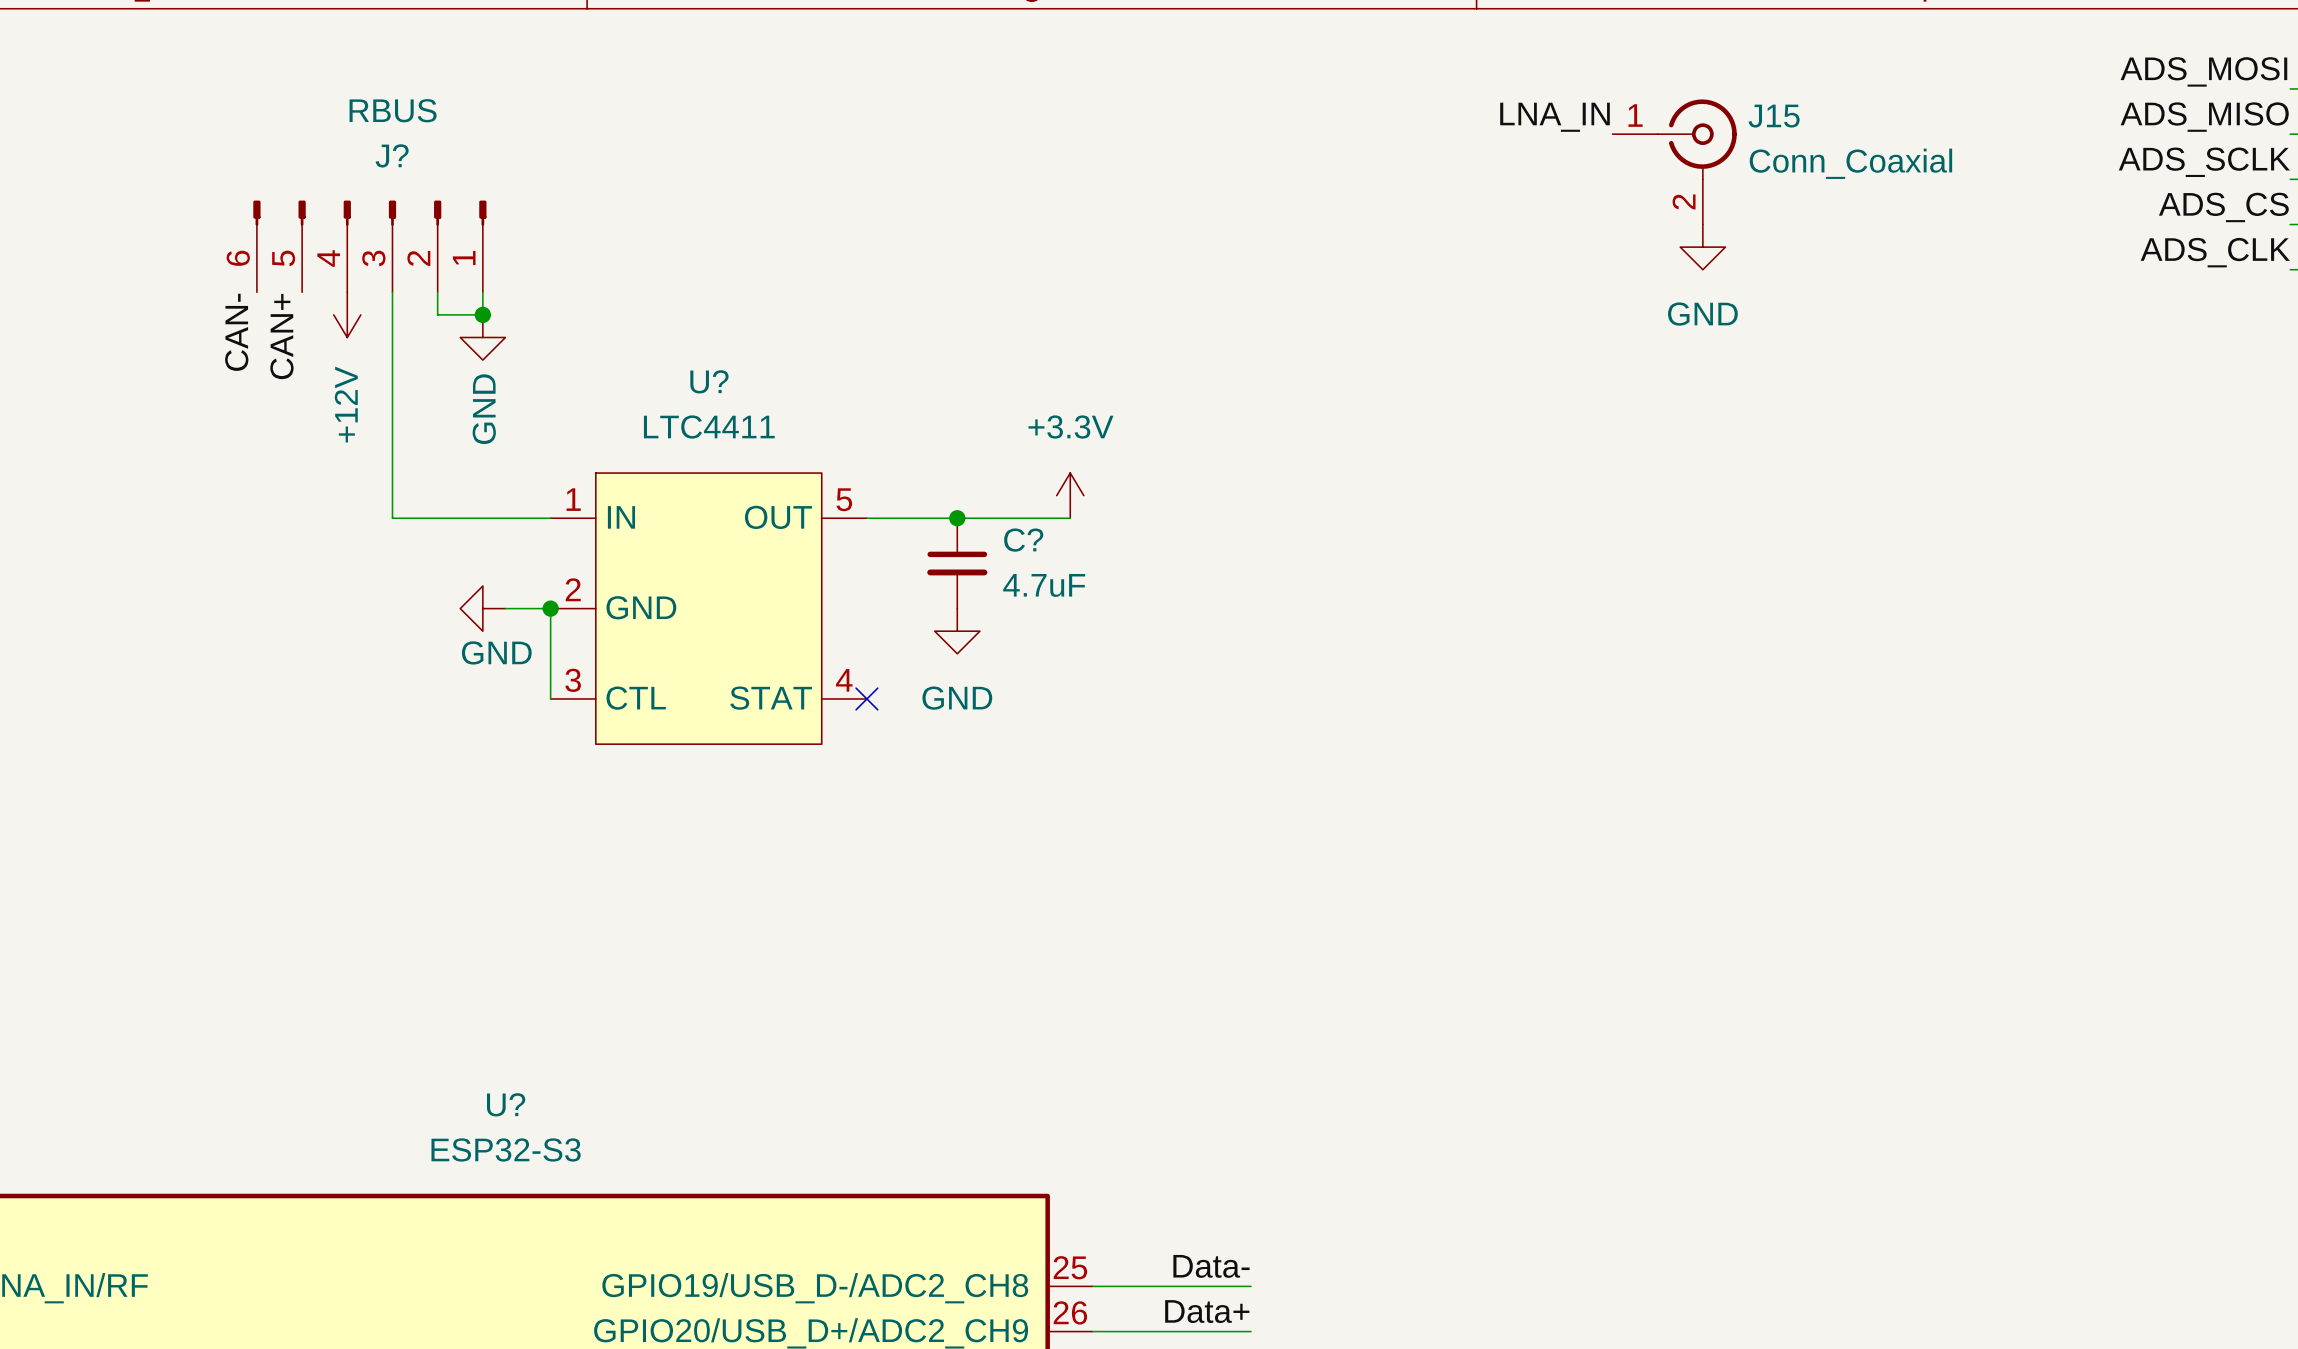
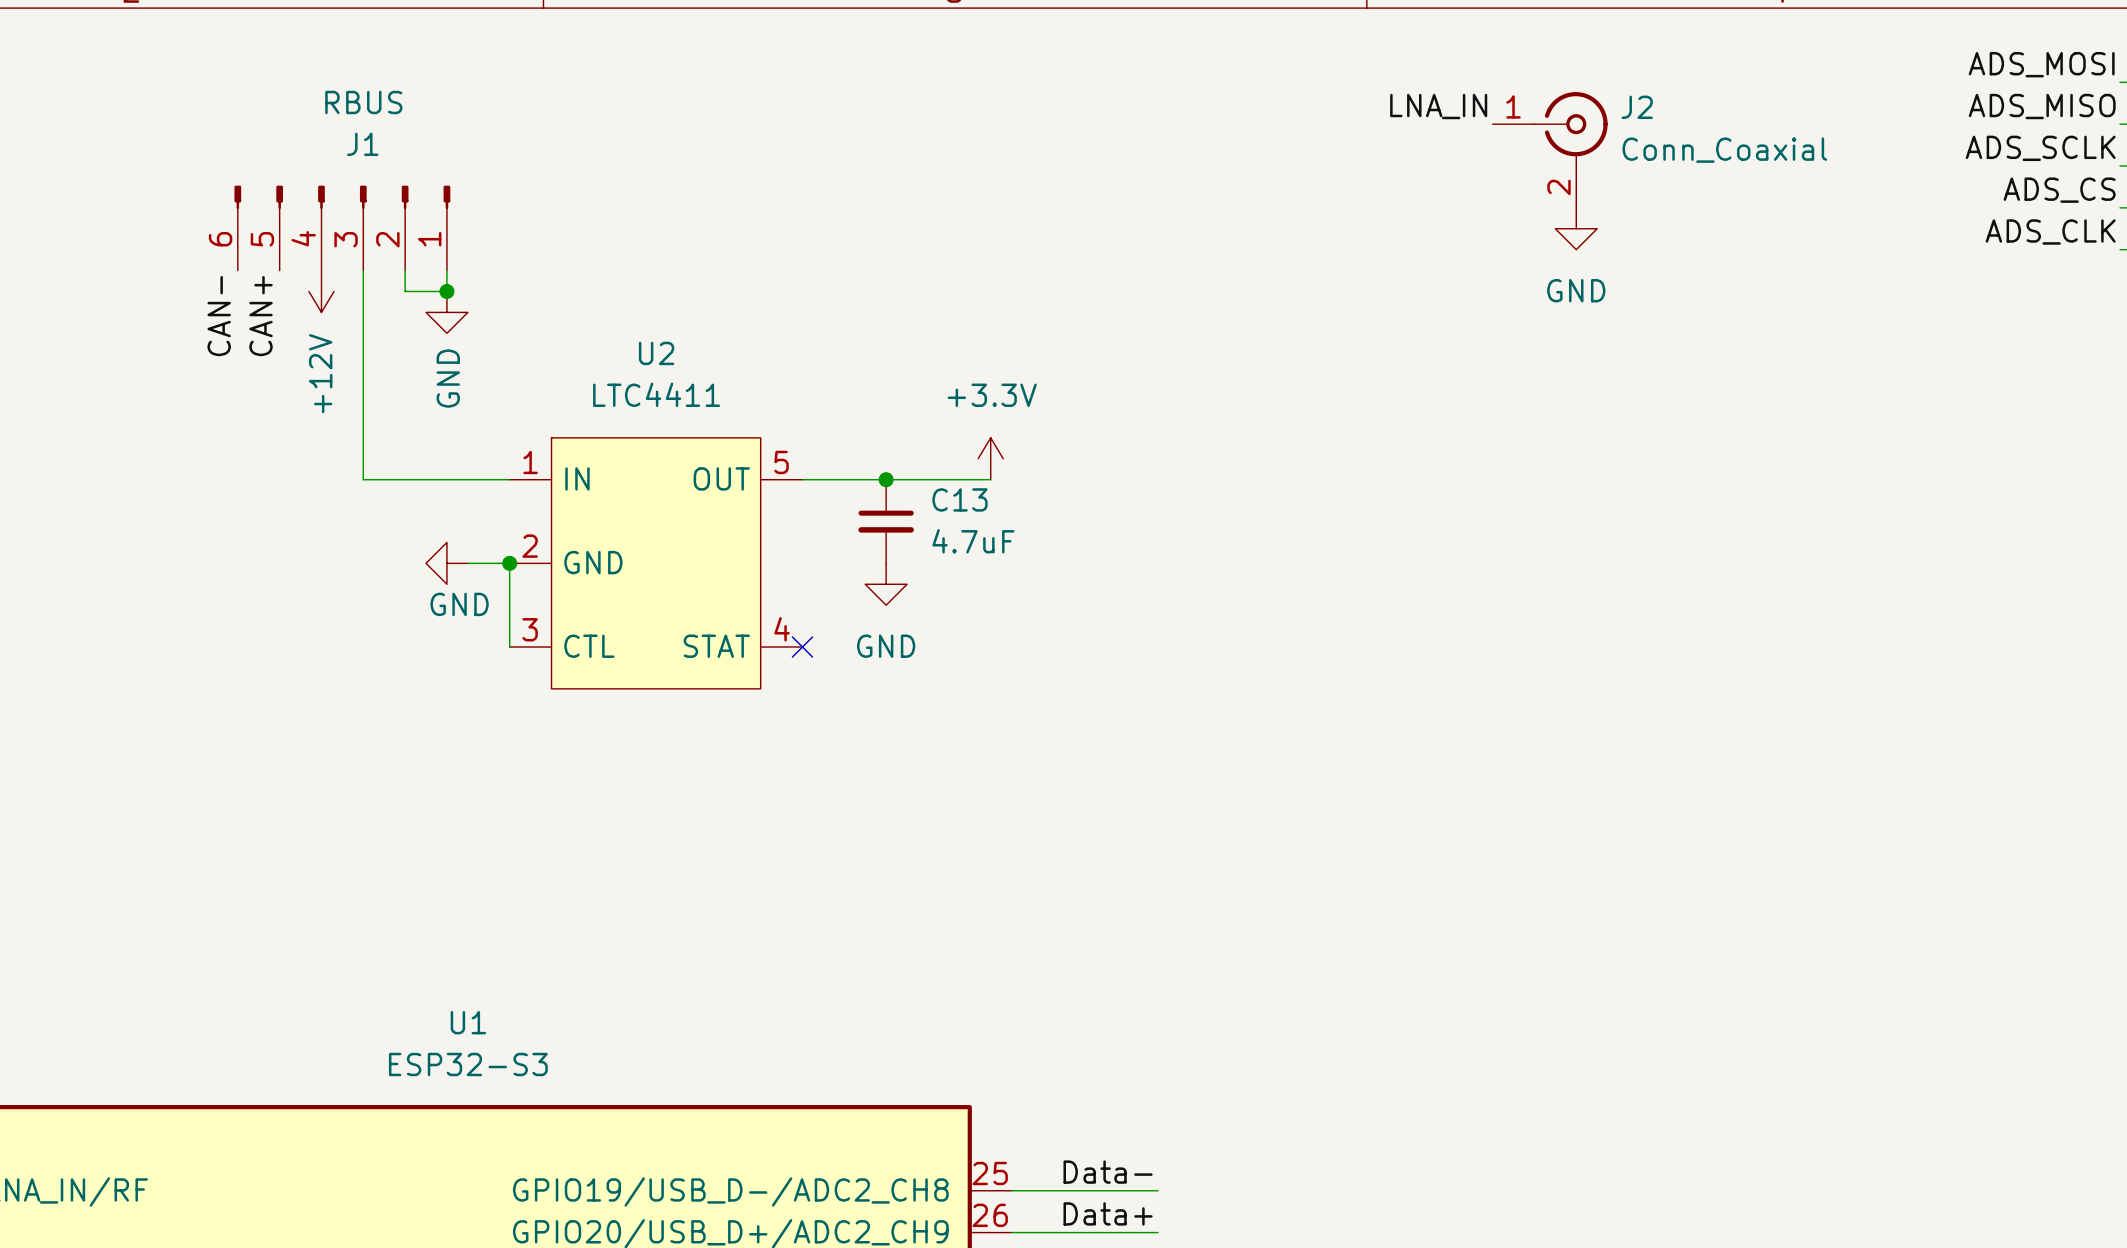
J15 name: J15 (1774, 116) -> J2 (1637, 107)
J? name: J? (392, 155) -> J1 (362, 144)
U? name: U? (709, 381) -> U2 (656, 353)
C? name: C? (1023, 540) -> C13 (959, 499)
U? name: U? (506, 1104) -> U1 (468, 1022)

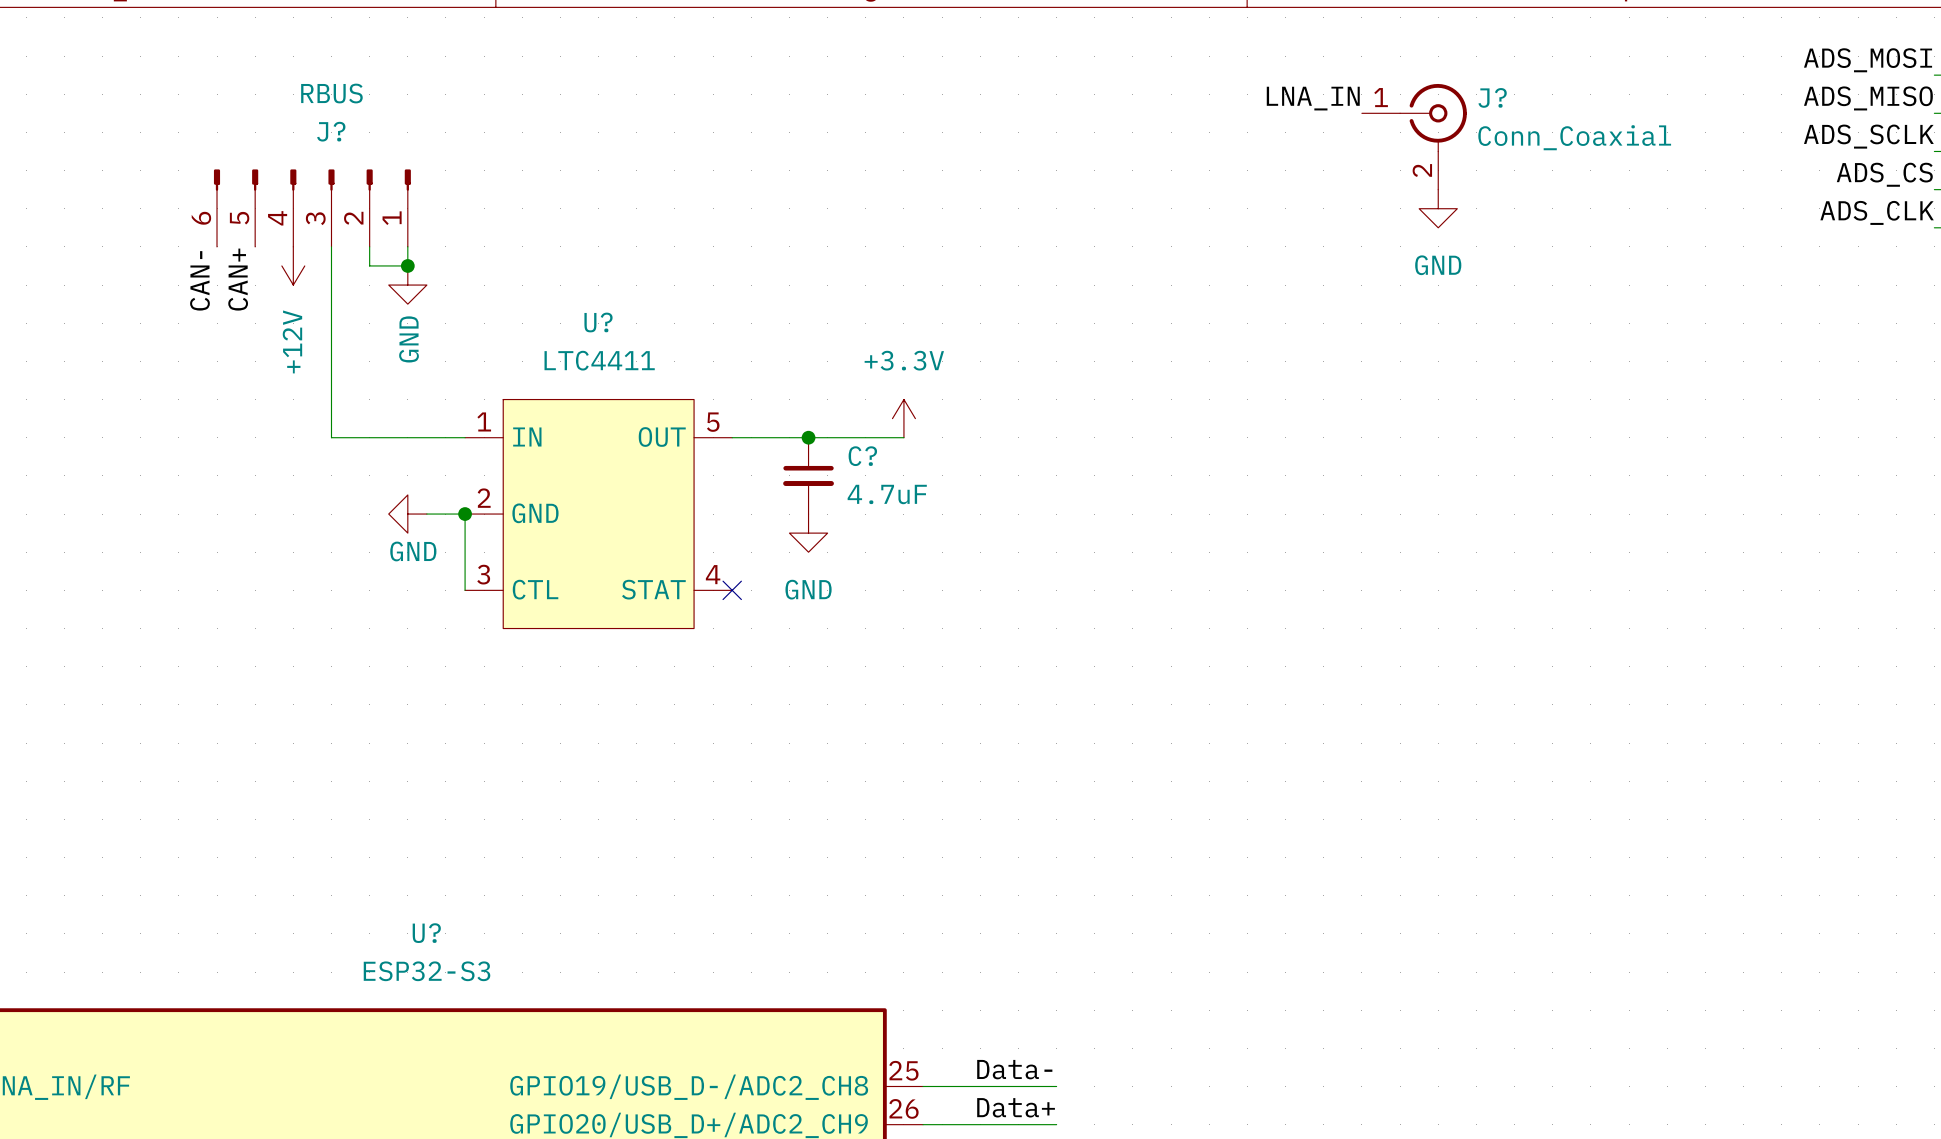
J2 name: J2 (1637, 107) -> J? (1492, 97)
J1 name: J1 (362, 144) -> J? (331, 131)
U2 name: U2 (656, 353) -> U? (598, 322)
C13 name: C13 (959, 499) -> C? (862, 456)
U1 name: U1 (468, 1022) -> U? (426, 933)

